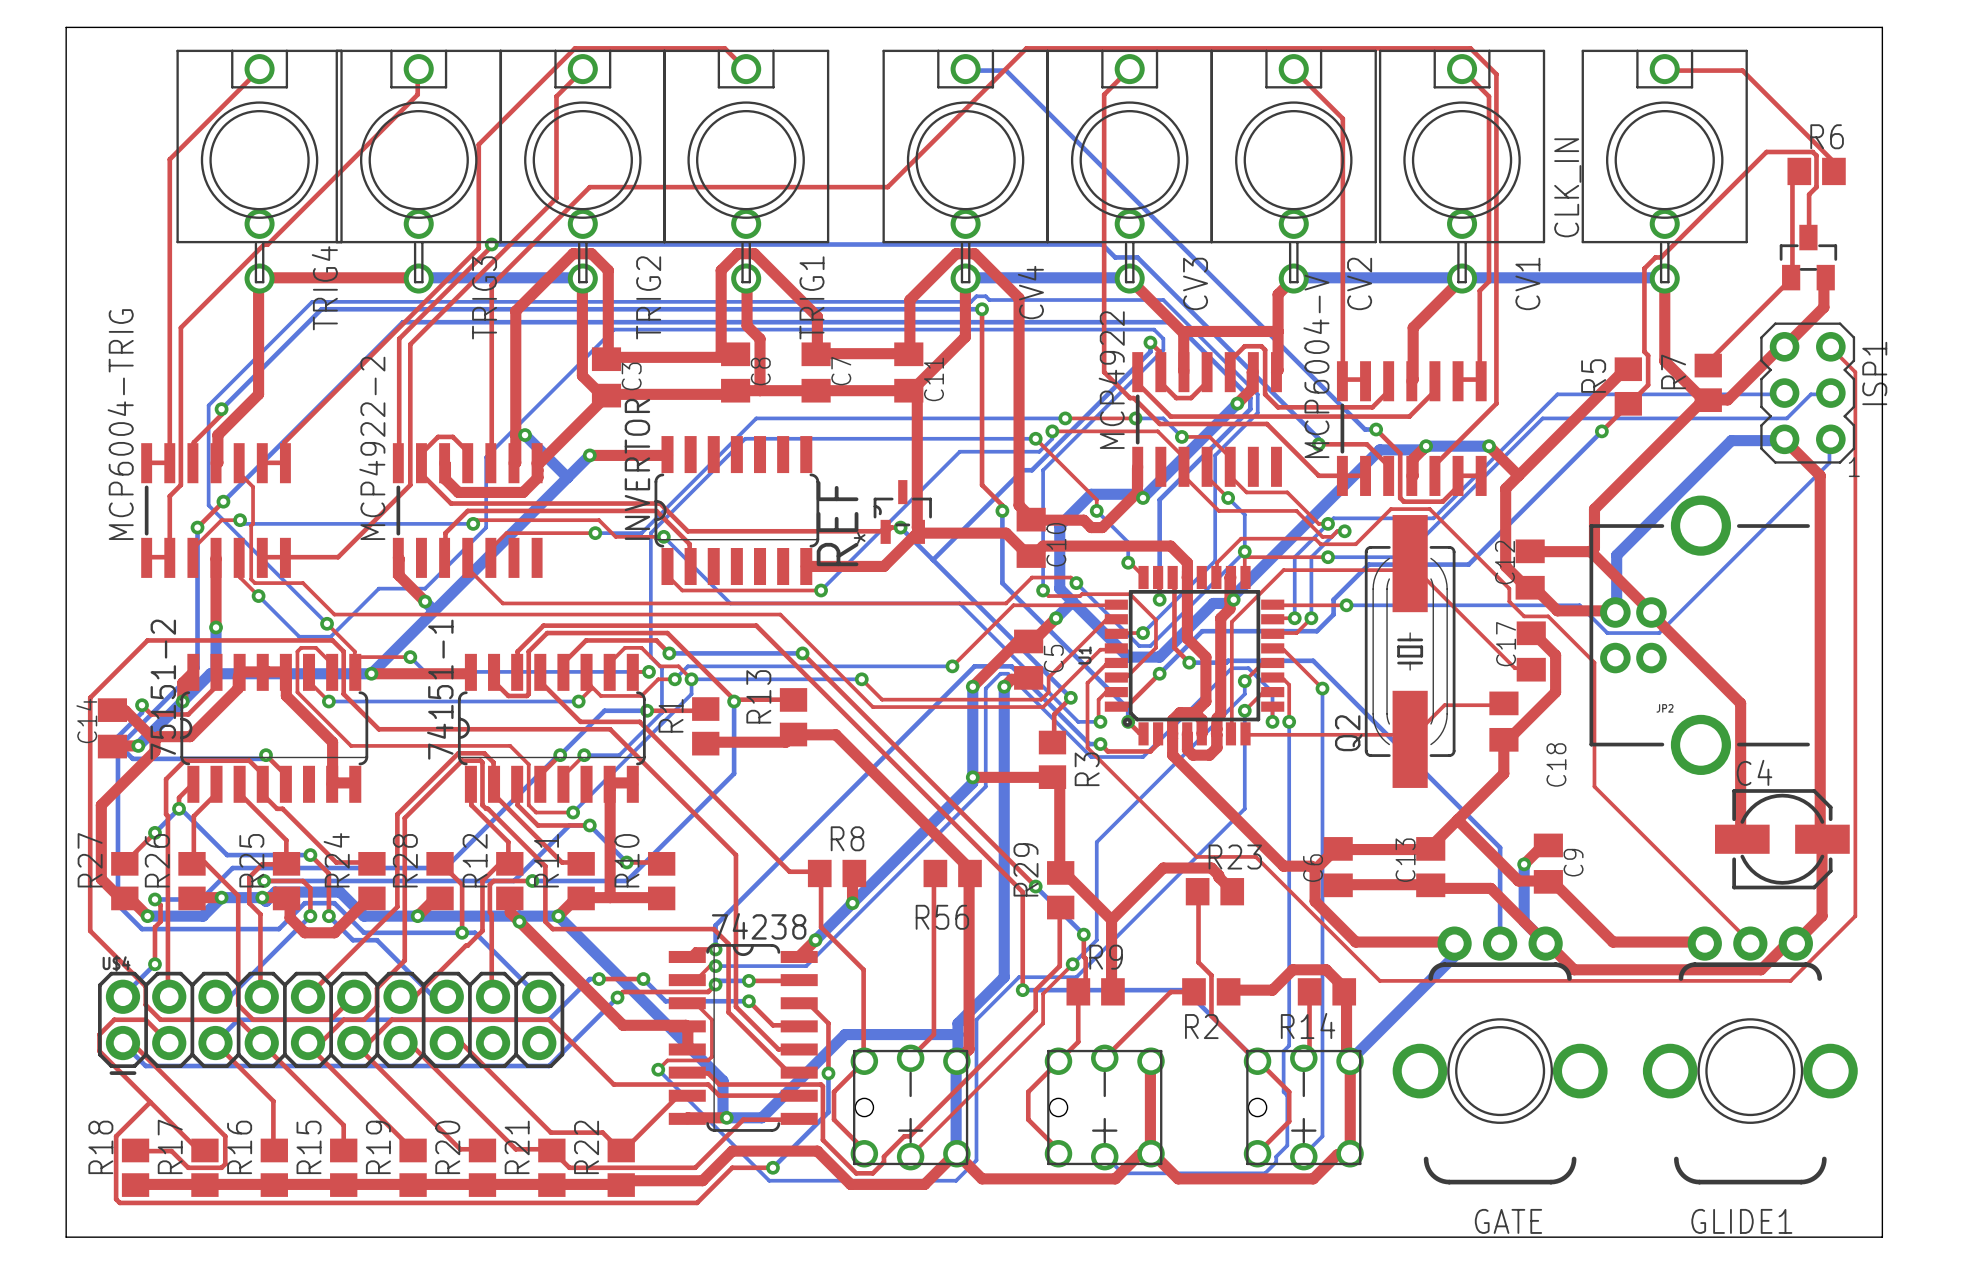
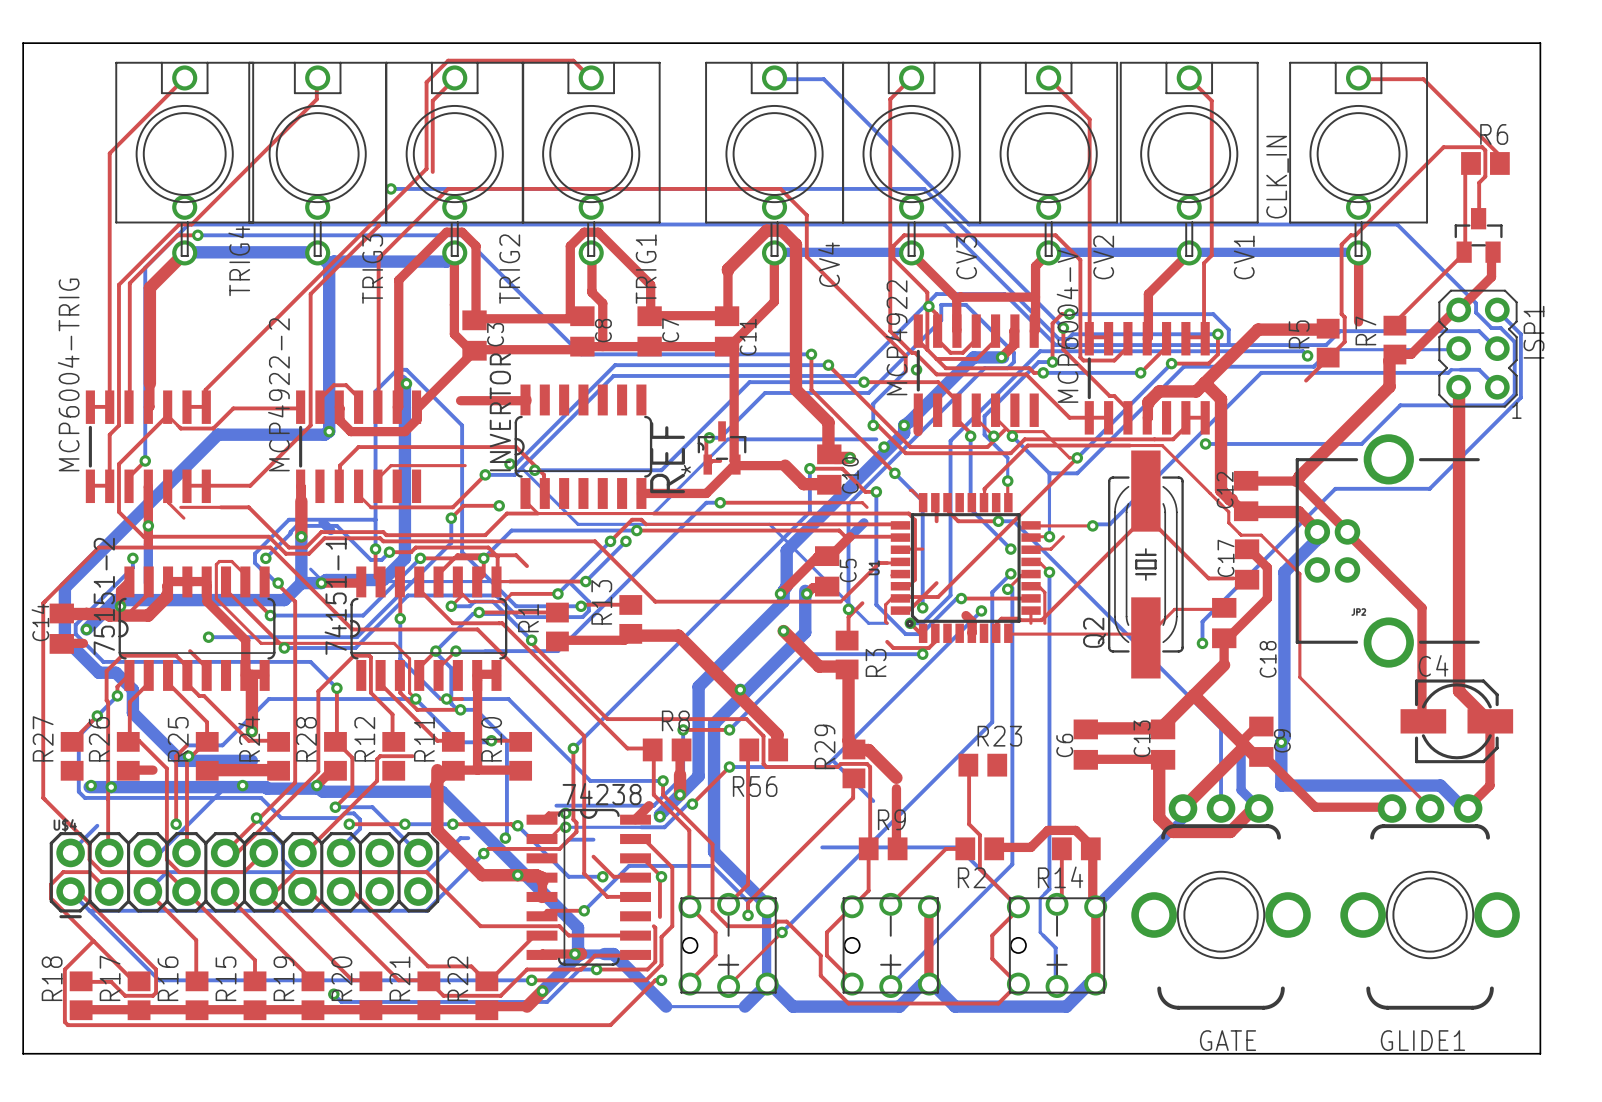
bottom track: (1006, 70) (1365, 429) (1376, 429) -> (808, 79) (823, 79) (969, 224) (1397, 224) (1476, 303) (1476, 312) (1491, 328) (1500, 328) (1514, 341) (1514, 394) (1503, 405) (1400, 405) (1361, 443) (1205, 443)
top track: (549, 74) (478, 144) (478, 248) -> (426, 82) (426, 168) (367, 227)
top track: (556, 181) (556, 198) (410, 344) -> none
bottom track: none -> (391, 188) (924, 188) (1063, 328)
top track: (574, 201) (589, 187) (887, 187) (1026, 48) (1470, 48) (1496, 74) (1496, 375) -> (448, 188) (780, 188) (806, 215) (806, 256)
top track: (264, 244) (251, 257) -> (197, 235) (177, 235)
bottom track: none -> (378, 224) (188, 224) (145, 267) (145, 460)
via position: (491, 244) -> (391, 188)
bottom track: (1102, 244) (1115, 257) (1137, 257) (1318, 438) (1318, 444) -> (888, 224) (944, 224) (1058, 338) (1068, 338) (1072, 334) (1217, 334)
bottom track: none -> (197, 235) (462, 235) (581, 354) (811, 354)
via: none -> (197, 235)
top track: (259, 278) (418, 278) -> none
bottom track: none -> (184, 252) (312, 252) (317, 252) (329, 264)
bottom track: (418, 278) (582, 278) -> (329, 264) (333, 261) (446, 261) (454, 252)
top track: (258, 279) (258, 394) (217, 435) -> (183, 253) (149, 287) (149, 383)
top track: (1004, 283) (974, 253) (956, 253) (909, 300) -> (850, 457) (834, 457) (829, 454) (828, 422) (795, 389) (795, 244) (782, 230) (766, 230) (727, 270)
top track width: thick (1004, 283) (1019, 298) -> thin (806, 256) (819, 269)
bottom track: none -> (329, 264) (329, 431) (324, 434) (217, 434) (64, 587) (64, 638) (98, 672) (115, 672) (132, 689) (132, 712) (180, 760) (251, 760)
top track: (1019, 298) (1019, 505) (1032, 520) (1083, 520) (1091, 527) (1102, 527) (1137, 492) (1143, 497) -> (819, 269) (905, 355) (905, 371)
top track: (982, 309) (982, 485) (1002, 505) (1002, 510) -> none
bottom track: (982, 309) (321, 309) (221, 409) -> none
via: (982, 309) -> none
top track: (193, 314) (180, 327) -> (188, 224) (179, 224) (118, 284) (118, 294)
top track: (410, 327) (399, 338) (398, 463) -> (310, 294) (310, 307)
bottom track: (1150, 342) (1150, 351) (1032, 470) (1022, 470) (933, 559) -> none
top track: (1830, 346) (1855, 372) (1855, 916) (1790, 980) (1379, 980) (1255, 856) (1196, 856) (1087, 747) (1087, 683) (1106, 664) -> none
bottom track: none -> (1497, 309) (1520, 334) (1520, 397) (1429, 488) (1335, 488) (1202, 621) (1202, 643)
top track: none -> (1069, 314) (1061, 314) (1052, 323) (1052, 362)
bottom track: none -> (1069, 314) (1213, 314) (1228, 329) (1228, 345)
via: none -> (1069, 314)
top track: (1664, 361) (1703, 399) (1708, 400) (1699, 403) (1594, 509) (1594, 547) (1590, 551) -> (1395, 354) (1389, 360) (1389, 386) (1296, 481)
via: none -> (1063, 328)
top track: (1624, 370) (1505, 488) (1505, 566) (1513, 573) -> (1324, 329) (1258, 329) (1196, 391) (1159, 391) (1148, 403)
top track: none -> (995, 331) (995, 340) (976, 358) (936, 358)
top track: (1230, 372) (1231, 359) (1244, 346) (1261, 346) (1265, 349) (1265, 394) (1278, 407) (1335, 407) -> (927, 349) (927, 292) (893, 258) (893, 246) (904, 235) (1055, 235) (1080, 260) (1080, 357) (1083, 360)
via: none -> (1217, 334)
bottom track: (1830, 393) (1810, 394) (1786, 418) -> (1497, 387) (1479, 369) (1460, 369)
bottom track: none -> (1497, 348) (1479, 331) (1340, 331) (1326, 345) (1055, 345) (1004, 294) (936, 294) (854, 375) (613, 375) (514, 474) (485, 474)
bottom track: (1631, 394) (1557, 394) (1433, 518) (1333, 518) -> (1330, 349) (1313, 366) (1183, 366) (1077, 473) (1049, 473)
top track: none -> (811, 354) (811, 389) (894, 473)
via: none -> (811, 354)
top track: (1496, 399) (1496, 403) (1435, 464) (1434, 475) -> (1217, 354) (1208, 363) (1171, 363)
bottom track: (1237, 403) (1143, 497) (1139, 494) (1091, 494) (1059, 525) (1059, 588) (1128, 657) (1159, 657) (1213, 603) (1229, 603) (1233, 599) (1233, 596) (1379, 449) (1422, 449) (1426, 446) (1489, 446) -> none
bottom track: none -> (1003, 357) (973, 357) (904, 425) (904, 433) (786, 550) (786, 586) (783, 590) (783, 601) (698, 686) (698, 776) (659, 816)
top track: (221, 409) (221, 414) (193, 442) -> (129, 283) (129, 389)
via: (221, 409) -> none
via: none -> (1052, 362)
bottom track: none -> (1171, 363) (1081, 453)
via: none -> (1171, 363)
top track: none -> (828, 365) (910, 447) (986, 447)
bottom track: none -> (828, 365) (615, 365) (516, 464) (510, 464)
via: none -> (828, 365)
top track: (1270, 416) (1409, 416) -> (1029, 368) (1034, 372) (1043, 372)
top track: (1065, 418) (1135, 418) -> none
bottom track: (1065, 418) (756, 418) (641, 533) (595, 533) -> none
via: (1065, 418) -> none
bottom track: (1135, 418) (1163, 418) (1181, 436) -> none
bottom track: (1775, 418) (1542, 418) (1403, 557) (1328, 557) -> (1451, 369) (1448, 372) (1261, 372) (1109, 524) (1092, 524)
bottom track: none -> (905, 371) (873, 403) (873, 425)
bottom track: none -> (1043, 372) (1140, 372)
via: none -> (1043, 372)
via: none -> (1140, 372)
top track: (1376, 429) (1400, 453) (1400, 497) (1403, 501) -> (873, 425) (877, 425) (905, 453) (1010, 453) (1024, 439) (1140, 439)
via: (1376, 429) -> none
bottom track: none -> (401, 380) (404, 383) (404, 558) (383, 580) (326, 580) (321, 583) (301, 583)
top track: (1052, 431) (1157, 431) (1183, 457) -> (863, 382) (938, 382) (956, 402)
bottom track: (1052, 431) (1052, 438) (1039, 451) (959, 451) (909, 501) -> (876, 439) (727, 439)
via: (1052, 431) -> none
bottom track: (1601, 431) (1468, 564) (1368, 564) (1333, 599) (1333, 614) (1316, 631) (1202, 631) (1159, 673) -> none
via position: (1601, 431) -> (1307, 355)
bottom track: none -> (863, 382) (749, 382) (661, 470) (534, 470)
via: none -> (863, 382)
top track: none -> (1204, 382) (1221, 399) (1221, 490) (1231, 499)
bottom track: (525, 435) (567, 477) -> none
top track: (1181, 436) (1209, 436) (1229, 457) (1230, 466) -> none
via: (1181, 436) -> none
top track: (1035, 438) (1096, 499) (1096, 510) -> none
bottom track: (1035, 438) (745, 438) (650, 533) (650, 657) (661, 668) (661, 712) (619, 755) -> (720, 502) (706, 502) (557, 651) (485, 651)
via: (1035, 438) -> none
bottom track: (1784, 439) (1731, 440) (1616, 555) (1615, 612) -> (1468, 808) (1462, 807) (1440, 785) (1281, 785) (1281, 742) (1284, 737) (1284, 572) (1316, 539) (1317, 531)
bottom track: (1830, 439) (1829, 462) (1659, 633) (1607, 633) (1579, 605) (1346, 605) -> none
top track: (1785, 440) (1820, 475) (1820, 834) (1822, 839) -> (1459, 388) (1459, 691) (1490, 721)
top track: (1318, 444) (1366, 444) (1372, 449) -> (1063, 328) (1063, 349) (1109, 396) (1114, 396)
via: (1318, 444) -> none
via: (1426, 446) -> none
top track: (1489, 446) (1518, 475) -> none
via: (1489, 446) -> none
top track: (423, 451) (421, 453) (423, 475) (451, 503) (660, 503) (687, 531) (883, 531) -> (709, 437) (706, 437) (706, 464)
bottom track: (589, 455) (371, 673) (210, 673) (138, 745) -> none
via: (589, 455) -> none
top track: (1185, 477) (1218, 510) -> (958, 419) (970, 433) (970, 436)
via: none -> (873, 425)
top track: (253, 486) (251, 579) (254, 583) -> (179, 426) (213, 428) (233, 408) (300, 407)
via position: (1143, 497) -> (904, 425)
bottom track: none -> (970, 436) (970, 508) (1010, 549)
via: none -> (970, 436)
bottom track: (1228, 497) (1244, 514) (1244, 523) -> (1052, 362) (1038, 362) (984, 416) (984, 434) (1007, 457)
bottom track: none -> (1012, 436) (1049, 473)
via: none -> (1012, 436)
bottom track: none -> (709, 437) (720, 437) (765, 392) (868, 392) (941, 320) (941, 304) (966, 304) (1013, 352) (1013, 362) (1007, 368) (984, 368) (848, 504) (848, 609)
via: none -> (709, 437)
top track: (223, 501) (197, 527) -> none
bottom track: (223, 501) (402, 322) (1174, 322) (1250, 398) (1250, 409) (1159, 499) (1159, 599) -> none
via: (223, 501) -> none
via: none -> (1205, 443)
top track: (1390, 509) (1355, 544) (1320, 544) (1315, 538) (1241, 538) (1217, 562) -> (1129, 445) (1027, 445) (984, 490)
bottom track: (1002, 510) (1002, 583) (1128, 708) (1128, 721) -> (1307, 355) (1302, 351) (1040, 351) (950, 440) (950, 595) (922, 623) (910, 623)
via position: (1002, 510) -> (809, 468)
bottom track: (1096, 510) (1128, 542) (1128, 562) -> none
top track: (1220, 510) (1296, 510) (1322, 536) (1331, 536) (1337, 531) (1344, 531) -> (987, 447) (1005, 429)
top track: (240, 520) (221, 520) (193, 547) -> (145, 460) (129, 477)
bottom track: (240, 520) (243, 523) (473, 523) -> none
via: (240, 520) -> none
top track: none -> (1078, 456) (938, 597) (900, 598)
bottom track: (1329, 522) (1294, 557) -> (1049, 473) (1049, 485)
top track: (473, 523) (476, 520) (599, 520) (615, 536) (663, 536) -> none
via position: (473, 523) -> (329, 431)
via: none -> (850, 457)
bottom track: (197, 527) (197, 644) -> none
via: (197, 527) -> none
via: none -> (145, 460)
bottom track: (900, 527) (1070, 697) -> none
via: (900, 527) -> none
via: none -> (510, 464)
bottom track: (1344, 531) (1337, 531) (1311, 557) (1311, 618) -> none
via: (1344, 531) -> none
via: (595, 533) -> none
top track: (978, 533) (1006, 533) (1030, 557) (1043, 546) (1170, 546) (1187, 562) (1187, 577) -> (785, 465) (803, 484) (829, 484)
via: (663, 536) -> none
top track: none -> (809, 468) (842, 468) (865, 491) (876, 491)
bottom track: none -> (809, 468) (809, 511) (573, 748)
via: none -> (534, 470)
bottom track: none -> (894, 473) (922, 501) (922, 607)
via: none -> (894, 473)
via: none -> (485, 474)
bottom track: (1244, 551) (1150, 646) (1139, 646) (1076, 583) -> none
top track: (1244, 557) (1328, 557) -> none
via: (1328, 557) -> none
via: (1128, 562) -> none
top track: (1410, 563) (1514, 668) -> (1145, 491) (1146, 516) (1208, 578) (1233, 578)
bottom track: none -> (876, 491) (876, 604) (905, 634) (921, 634) (956, 598) (961, 598)
via: none -> (876, 491)
top track: (1409, 564) (1403, 570) (1283, 570) (1231, 621) (1231, 721) -> (1145, 491) (1145, 516) (1041, 620) (1001, 618) (996, 623)
top track: (399, 575) (425, 601) -> (301, 501) (301, 536)
via: none -> (720, 502)
top track: (1032, 577) (1006, 603) -> (829, 502) (720, 502)
top track: (1187, 577) (1187, 638) (1205, 657) (1205, 701) (1194, 712) (1180, 712) (1172, 720) (1172, 755) (1283, 866) (1311, 866) (1315, 869) -> none
top track: (1230, 577) (1229, 609) (1220, 618) (1220, 714) (1217, 718) (1217, 747) (1209, 755) (1192, 755) (1187, 749) (1187, 733) -> none
top track: none -> (499, 505) (463, 505) (451, 518)
via: none -> (499, 505)
top track: (303, 583) (334, 614) (780, 614) (872, 707) (1043, 707) (1100, 649) -> (220, 507) (248, 507) (289, 547) (306, 547) (321, 532) (383, 532) (386, 535) (485, 535) (506, 513) (537, 513)
top track: (482, 583) (502, 603) (811, 603) -> (370, 507) (452, 507) (485, 474)
via: (1076, 583) -> none
top track: (1524, 584) (1535, 588) (1557, 610) (1614, 610) -> (1241, 508) (1247, 511) (1298, 511) (1316, 530)
top track: (1174, 588) (1174, 647) (1189, 662) -> (949, 511) (958, 521) (995, 521)
via: (821, 590) -> none
top track: (1043, 590) (1048, 596) (1130, 594) -> (653, 513) (908, 513) (911, 516)
bottom track: (1043, 590) (1043, 470) (1163, 349) (1163, 338) (1154, 329) (613, 329) (486, 457) (486, 527) (425, 588) (378, 588) (330, 636) (299, 636) (258, 596) -> none
via: (1043, 590) -> none
via: (258, 596) -> none
bottom track: none -> (451, 518) (451, 542) (357, 637) (208, 637)
via: none -> (451, 518)
bottom track: none -> (375, 519) (289, 519) (254, 553) (254, 563) (278, 584)
top track: (1133, 597) (1155, 620) (1155, 647) (1133, 670) -> (914, 519) (914, 580)
via: (1159, 599) -> none
via: (425, 601) -> none
top track: none -> (646, 524) (641, 519) (632, 519) (610, 541)
top track: (1116, 604) (1013, 605) (952, 666) -> (900, 525) (808, 524)
via: none -> (148, 525)
top track: none -> (636, 530) (839, 530) (845, 536) (900, 537)
bottom track: none -> (636, 530) (511, 530) (483, 558)
via: none -> (636, 530)
bottom track: none -> (301, 536) (301, 583)
via: none -> (301, 536)
via: (1056, 618) -> none
via: (1311, 618) -> none
top track: (1116, 619) (1106, 620) (1048, 677) (1048, 692) -> (887, 563) (879, 563) (843, 598)
top track: (327, 623) (354, 651) (354, 671) (355, 672) (354, 657) (410, 657) -> none
bottom track: (327, 623) (208, 505) (208, 405) (312, 301) (970, 301) (976, 296) (985, 296) (989, 300) (1163, 300) (1257, 394) (1257, 412) (1215, 455) (1215, 560) (1143, 633) -> none
via: (327, 623) -> none
bottom track: none -> (610, 541) (557, 593)
via: none -> (610, 541)
bottom track: none -> (625, 541) (585, 581)
via: none -> (625, 541)
via: (216, 627) -> none
bottom track: none -> (375, 549) (375, 391) (397, 369) (406, 369) (462, 425) (462, 552) (516, 606) (578, 606)
via: none -> (375, 549)
via: (1143, 633) -> none
via: none -> (1010, 549)
top track: none -> (389, 552) (411, 552) (415, 547) (488, 547) (497, 556) (496, 581)
bottom track: none -> (389, 552) (381, 559) (370, 559) (336, 525) (296, 525) (265, 558)
via: none -> (389, 552)
top track: (147, 640) (332, 640) (343, 651) (343, 694) -> (91, 555) (98, 547) (270, 547) (352, 629)
via: none -> (132, 558)
via: none -> (265, 558)
bottom track: none -> (420, 558) (363, 615) (270, 615)
via: none -> (420, 558)
via: none -> (483, 558)
bottom track: (669, 653) (802, 653) -> none
via: (669, 653) -> none
top track: (802, 653) (1035, 886) -> none
via: (802, 653) -> none
bottom track: (197, 655) (197, 668) (125, 740) (125, 751) (132, 758) (262, 758) (265, 755) -> (132, 567) (75, 624) (75, 634) (103, 661) (310, 661) (336, 688)
via: (410, 657) -> none
top track: (1294, 660) (1322, 688) -> none
via: none -> (1049, 572)
bottom track: (1313, 660) (1189, 662) -> (1064, 572) (1013, 521) (998, 521)
via: (1189, 662) -> none
bottom track: none -> (1010, 573) (992, 592) (992, 722) (782, 932)
via: none -> (1010, 573)
bottom track: (952, 666) (687, 666) (674, 679) -> none
via: (952, 666) -> none
top track: (610, 671) (610, 662) (624, 647) (641, 647) (660, 666) (678, 666) (691, 679) -> (477, 581) (483, 575) (483, 558) (420, 558)
top track: none -> (510, 581) (585, 581)
via: (648, 671) -> none
via: none -> (585, 581)
top track: (494, 672) (495, 683) (508, 695) (526, 695) (528, 694) (528, 651) (547, 633) (667, 633) (734, 699) -> (380, 581) (375, 576) (375, 549)
top track: (517, 672) (517, 651) (543, 625) (756, 625) (1022, 892) (1022, 990) -> (399, 581) (400, 618)
bottom track: none -> (569, 582) (588, 601) (588, 610) (582, 617) (517, 617) (496, 595) (408, 595) (355, 648) (284, 648)
top track: (371, 673) (423, 673) -> none
bottom track: none -> (301, 583) (284, 600) (115, 600) (86, 629)
via: none -> (321, 583)
via: (1159, 673) -> none
top track: (674, 679) (658, 679) (650, 686) -> (557, 593) (511, 593)
via: (674, 679) -> none
via: (691, 679) -> none
top track: (861, 679) (882, 699) (1041, 699) (1044, 695) -> (167, 407) (166, 416) (118, 464) (118, 511) (143, 536) (268, 536) (285, 553) (309, 553) (324, 538) (380, 538) (383, 541) (595, 541) (655, 601) (840, 601)
bottom track: (861, 679) (691, 679) (691, 694) (573, 812) -> none
via: (861, 679) -> none
bottom track: none -> (1012, 587) (1012, 864) (890, 986)
bottom track: (1244, 681) (1244, 694) (1096, 842) (1096, 940) (1072, 964) -> none
via: none -> (557, 593)
bottom track: (972, 686) (972, 782) (815, 940) -> none
bottom track: (1004, 686) (1004, 977) (957, 1023) (957, 1060) -> (805, 590) (805, 632) (714, 723) (714, 852) (768, 906)
top track: (238, 688) (190, 736) (158, 736) (154, 740) -> (166, 595) (148, 615) (72, 614)
bottom track: (1322, 688) (1322, 1136) (1303, 1156) -> none
via: (1322, 688) -> none
via: none -> (961, 598)
top track: (1263, 692) (1244, 710) -> (1023, 598) (961, 598)
via position: (1070, 697) -> (848, 609)
top track: none -> (242, 606) (284, 648)
bottom track: (328, 701) (578, 701) -> none
via: (328, 701) -> none
bottom track: none -> (454, 606) (469, 606) (474, 601) (493, 601) (531, 640)
bottom track: (734, 701) (734, 773) (626, 880) (532, 880) -> none
via: none -> (922, 607)
bottom track: (142, 705) (142, 712) (117, 736) (117, 905) (142, 929) (278, 929) (304, 903) (334, 903) (364, 932) (475, 932) (484, 942) -> (335, 807) (372, 807)
via: (142, 705) -> none
bottom track: none -> (981, 610) (825, 767) (729, 767)
via: none -> (981, 610)
via: none -> (479, 612)
top track: (705, 709) (704, 710) (647, 710) -> (557, 612) (479, 612)
top track: (125, 710) (154, 740) -> none
via: (647, 710) -> none
bottom track: (1244, 710) (1244, 808) (1076, 977) (1019, 977) (976, 1019) (976, 1160) (956, 1180) (930, 1180) -> (1095, 984) (1088, 984) (1066, 1006) (955, 1006) (935, 986) (929, 984) (921, 984) (899, 1006) (792, 1006) (772, 986) (767, 984) (744, 1006)
via: (1244, 710) -> none
top track: (362, 712) (378, 729) (460, 729) -> none
via: none -> (270, 615)
bottom track: none -> (400, 618) (400, 658) (440, 699)
via: none -> (400, 618)
via: (1100, 721) -> none
bottom track: (1272, 721) (1272, 692) (1248, 668) (1231, 668) (1143, 757) (1091, 757) (1007, 673) (1000, 673) (985, 688) (985, 786) (806, 966) -> (692, 804) (687, 804) (664, 827) (641, 827)
via: (1272, 721) -> none
bottom track: (1289, 721) (1289, 1045) -> (1049, 572) (1049, 889) (1044, 893)
via: (1289, 721) -> none
via: none -> (86, 629)
via: none -> (783, 631)
top track: (793, 734) (835, 734) (969, 868) (969, 1049) (956, 1061) -> (630, 633) (636, 635) (678, 635) (777, 734) (778, 749)
via: none -> (208, 637)
top track: (154, 740) (154, 751) (101, 805) (101, 879) (119, 897) (132, 901) (147, 916) -> none
via: none -> (531, 640)
bottom track: (1100, 744) (1089, 744) (1011, 666) (974, 666) (715, 925) (715, 949) -> none
via: (1100, 744) -> none
via: (138, 745) -> none
via: none -> (1202, 643)
via: none -> (284, 648)
via: (265, 755) -> none
bottom track: (560, 755) (445, 868) (304, 868) -> (493, 742) (459, 742) (415, 699) (268, 699) (222, 745)
bottom track: none -> (922, 654) (805, 654) (729, 729)
via: none -> (922, 654)
top track: (1503, 771) (1429, 849) (1338, 848) (1315, 869) -> (1224, 665) (1165, 723) (1163, 729) (1085, 729)
top track: (493, 773) (493, 762) (484, 753) (458, 753) (397, 814) (397, 906) (391, 912) -> (278, 584) (295, 601) (295, 782)
via: (972, 777) -> none
top track: (1052, 777) (972, 777) -> (847, 669) (842, 666) (819, 666) (783, 631)
top track: (1054, 777) (1059, 782) (1059, 871) (1065, 873) (1111, 919) (1163, 868) (1211, 868) (1232, 891) -> (848, 669) (848, 740) (854, 750) (868, 750) (896, 777)
top track: none -> (251, 675) (251, 731)
top track: (471, 794) (471, 805) (508, 842) -> (374, 695) (392, 714) (392, 723)
top track: none -> (336, 688) (335, 741)
via: none -> (336, 688)
via: none -> (740, 689)
top track: (419, 803) (404, 818) (404, 960) (377, 988) (377, 1006) (364, 1019) (343, 1019) (314, 1049) (308, 1043) -> (318, 691) (318, 771) (237, 852) (225, 852)
bottom track: (179, 808) (227, 855) (310, 855) -> none
top track: (486, 808) (545, 866) (545, 921) (552, 929) (713, 929) (728, 943) (728, 960) -> (573, 748) (573, 819) (576, 822)
top track: (536, 812) (565, 812) -> none
via: none -> (415, 699)
top track: none -> (446, 699) (462, 699)
bottom track: none -> (462, 699) (508, 699) (590, 780) (663, 780)
top track: (1457, 819) (1518, 880) (1540, 880) -> (1193, 695) (1255, 756)
bottom track: (586, 825) (569, 825) (513, 880) (264, 880) -> (457, 709) (451, 703) (451, 668) (435, 651)
bottom track: (589, 825) (626, 862) -> (460, 709) (476, 709) (506, 740) (506, 835)
top track: none -> (683, 729) (729, 729)
bottom track: none -> (683, 729) (683, 776) (653, 805) (556, 805)
via: none -> (683, 729)
via: none -> (729, 729)
top track: (310, 855) (328, 873) (328, 916) -> none
via position: (310, 855) -> (251, 731)
top track: (735, 855) (735, 1006) (778, 1049) -> (582, 734) (584, 736) (584, 873)
top track: (509, 863) (500, 862) (482, 880) (482, 930) (415, 995) (404, 995) -> (377, 780) (306, 852)
top track: (284, 864) (262, 864) (249, 877) (249, 880) -> (186, 745) (176, 756)
top track: none -> (205, 742) (186, 760) (186, 852)
via position: (1524, 864) -> (1281, 742)
bottom track: (262, 868) (232, 868) (201, 899) (154, 899) -> none
top track: (1315, 869) (1315, 901) (1355, 942) (1453, 942) (1454, 943) -> (1244, 746) (1183, 808)
via: none -> (573, 748)
top track: (264, 880) (303, 880) (310, 888) (310, 916) -> none
via: (532, 880) -> none
top track: (460, 882) (462, 884) (462, 932) -> (352, 757) (352, 790) (335, 807)
top track: (1430, 885) (1435, 888) (1490, 888) (1574, 969) (1761, 969) (1786, 943) (1795, 943) -> (1163, 759) (1159, 763) (1159, 818) (1173, 831) (1230, 831) (1253, 808) (1259, 808)
via: (1035, 886) -> none
top track: none -> (729, 767) (692, 804)
via: none -> (729, 767)
via: (221, 897) -> none
top track: (262, 897) (286, 897) (290, 903) (290, 917) (304, 932) (334, 932) (367, 899) (371, 898) -> (207, 770) (278, 770)
via: (262, 897) -> none
top track: (509, 898) (510, 912) (623, 1025) (686, 1025) (687, 1030) -> (437, 770) (437, 830) (482, 875) (536, 875) (542, 877) (542, 881)
top track: (154, 899) (160, 905) (160, 921) (154, 927) (154, 964) -> none
via: (154, 899) -> none
top track: (249, 903) (260, 914) (261, 996) -> (176, 774) (176, 824)
top track: none -> (680, 774) (680, 794)
via: (852, 903) -> none
top track: (489, 910) (491, 914) (493, 996) -> none
via: none -> (663, 780)
bottom track: (147, 916) (203, 916) (221, 897) (262, 897) (265, 901) (275, 892) (340, 892) (364, 916) (558, 916) (723, 1080) (723, 1114) (726, 1117) (734, 1117) -> none
via: (310, 916) -> none
bottom track: (328, 916) (352, 940) (377, 940) (432, 995) (446, 996) -> (97, 716) (78, 736) (78, 791) (84, 797) (261, 797) (281, 818) (340, 818) (344, 813) (353, 813) (360, 819) (360, 828) (341, 847) (341, 852)
via: (558, 916) -> none
bottom track: none -> (89, 787) (265, 787) (318, 788) (323, 791) (442, 791) (578, 927) (578, 949) (581, 954) (542, 991)
via: none -> (111, 787)
via: (519, 921) -> none
via: none -> (680, 794)
top track: (1059, 930) (1059, 966) (1035, 990) (1035, 1010) (909, 1136) (904, 1136) (883, 1156) (883, 1162) (872, 1173) (856, 1173) (822, 1140) (822, 1127) -> (853, 797) (748, 903) (748, 915)
via: (462, 932) -> none
top track: (1083, 934) (1085, 984) (1080, 990) -> (531, 640) (531, 643) (607, 719) (746, 719) (763, 736) (763, 763) (766, 767) (837, 767) (840, 763) (867, 763) (870, 767) (870, 847)
via: (1083, 934) -> none
via: none -> (692, 804)
via: (815, 940) -> none
via: none -> (335, 807)
via: none -> (659, 816)
bottom track: none -> (256, 818) (282, 844) (282, 859) (295, 872)
via: none -> (256, 818)
via: none -> (176, 824)
top track: none -> (349, 824) (404, 824)
via: none -> (349, 824)
bottom track: none -> (404, 824) (452, 824)
via: none -> (404, 824)
top track: none -> (452, 824) (517, 825)
via: (154, 964) -> none
bottom track: none -> (517, 825) (568, 876) (602, 876)
via: none -> (517, 825)
top track: (1072, 964) (1043, 993) (1043, 1023) (974, 1091) -> none
via: (1072, 964) -> none
top track: (728, 971) (728, 1012) (737, 1021) -> (576, 831) (565, 842)
top track: (599, 979) (643, 979) -> none
via position: (599, 979) -> (452, 824)
bottom track: (643, 979) (665, 1001) (748, 1001) -> none
via: (748, 980) -> none
top track: (799, 980) (748, 980) -> (635, 839) (644, 839) (672, 867) (672, 926) (661, 937) (661, 964) (646, 980) (531, 980)
via: (715, 984) -> none
via: (1022, 990) -> none
via: (748, 1001) -> none
top track: (687, 1003) (687, 1004) (697, 1004) (711, 1019) (711, 1056) (708, 1060) (667, 1060) (658, 1069) -> none
via: none -> (517, 875)
via: none -> (602, 876)
via: none -> (661, 876)
bottom track: (957, 1034) (845, 1034) (761, 1117) -> none
top track: (765, 1049) (787, 1071) (799, 1072) -> (607, 896) (618, 896)
top track: (864, 1061) (834, 1091) (834, 1119) (863, 1149) (864, 1153) -> (689, 906) (715, 932) (715, 955) (690, 980) (689, 984)
top track: (1257, 1061) (1289, 1091) (1289, 1121) (1257, 1153) -> (1018, 906) (1017, 910) (992, 935) (992, 958) (1018, 984) (998, 1003) (848, 1003) (820, 975) (820, 955) (786, 921) (777, 921) (772, 926) (727, 926) (712, 910) (712, 844) (663, 794) (663, 780)
bottom track: none -> (89, 910) (159, 980) (531, 980)
bottom track: none -> (584, 910) (629, 865) (712, 865) (748, 901) (748, 915)
via: none -> (584, 910)
bottom track: (658, 1069) (769, 1180) (835, 1180) -> (604, 954) (613, 954) (666, 1006)
via: (658, 1069) -> none
via: none -> (748, 915)
top track: (687, 1072) (708, 1073) (719, 1084) (821, 1084) -> (542, 916) (547, 910) (584, 910)
bottom track: (828, 1073) (828, 1112) (772, 1167) -> none
via: (828, 1073) -> none
via: none -> (782, 932)
bottom track: (1287, 1095) (1287, 1145) (1276, 1156) (1276, 1162) (1265, 1173) (1122, 1173) (1104, 1156) -> (1043, 935) (1055, 947) (1057, 986)
top track: none -> (574, 954) (581, 954)
top track: (750, 1119) (743, 1119) (695, 1167) (637, 1167) -> (595, 955) (581, 969) (527, 969) (500, 995)
top track: none -> (655, 961) (647, 969) (596, 969)
bottom track: none -> (596, 969) (579, 969) (547, 1001) (341, 1001) (333, 994)
via: none -> (596, 969)
via: none -> (531, 980)
via: none -> (661, 980)
top track: (1350, 1153) (1337, 1154) (1313, 1178) (1178, 1178) (1151, 1153) (1139, 1154) (1115, 1178) (982, 1178) (956, 1153) (924, 1184) (850, 1184) (817, 1151) (732, 1151) (702, 1180) (669, 1180) -> (542, 991) (527, 1006)
via: none -> (542, 991)
via: none -> (333, 994)
top track: (772, 1167) (732, 1167) (697, 1202) -> (661, 980) (655, 980) (610, 1025) (550, 1025)
via: (772, 1167) -> none

